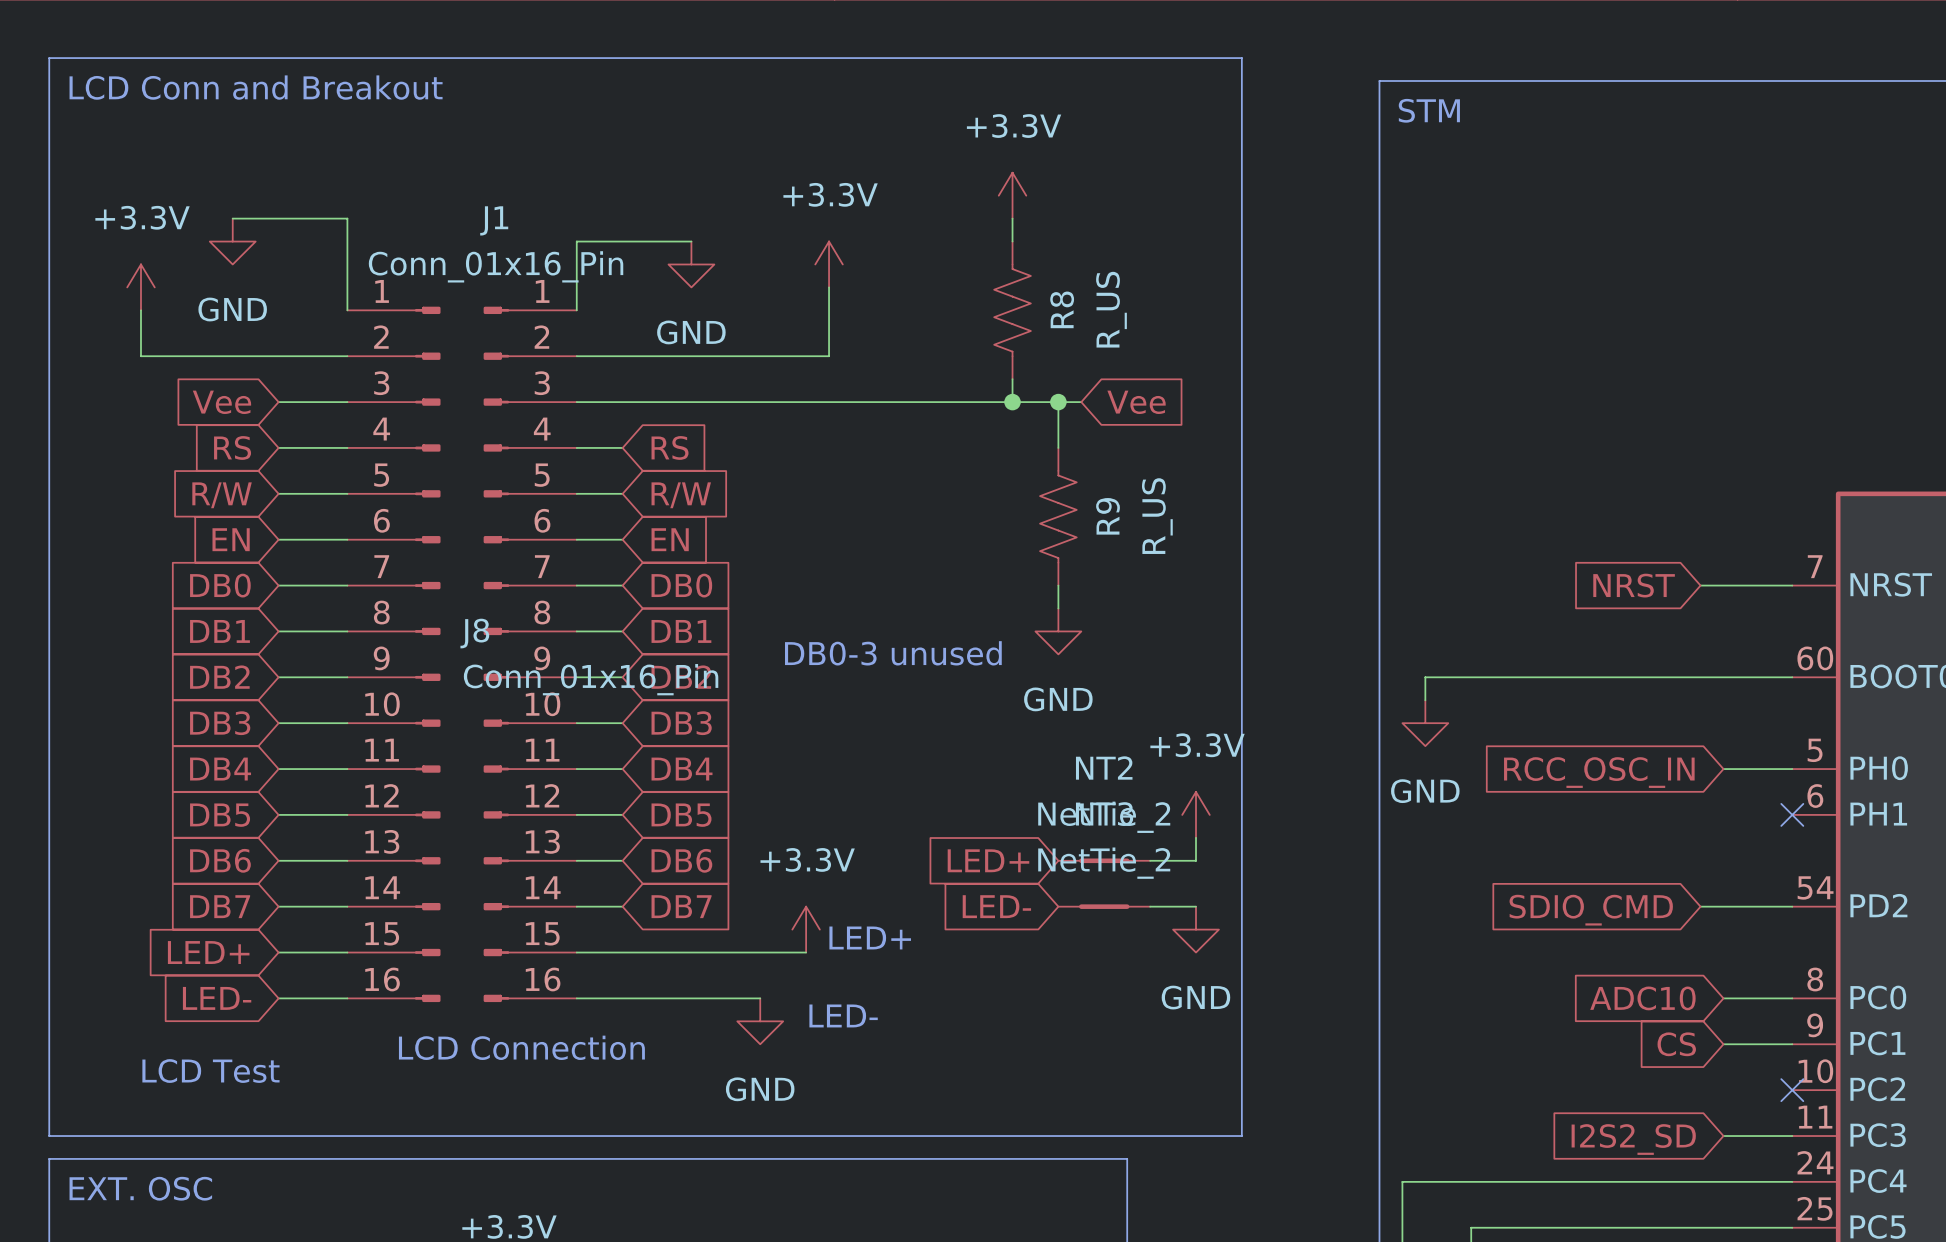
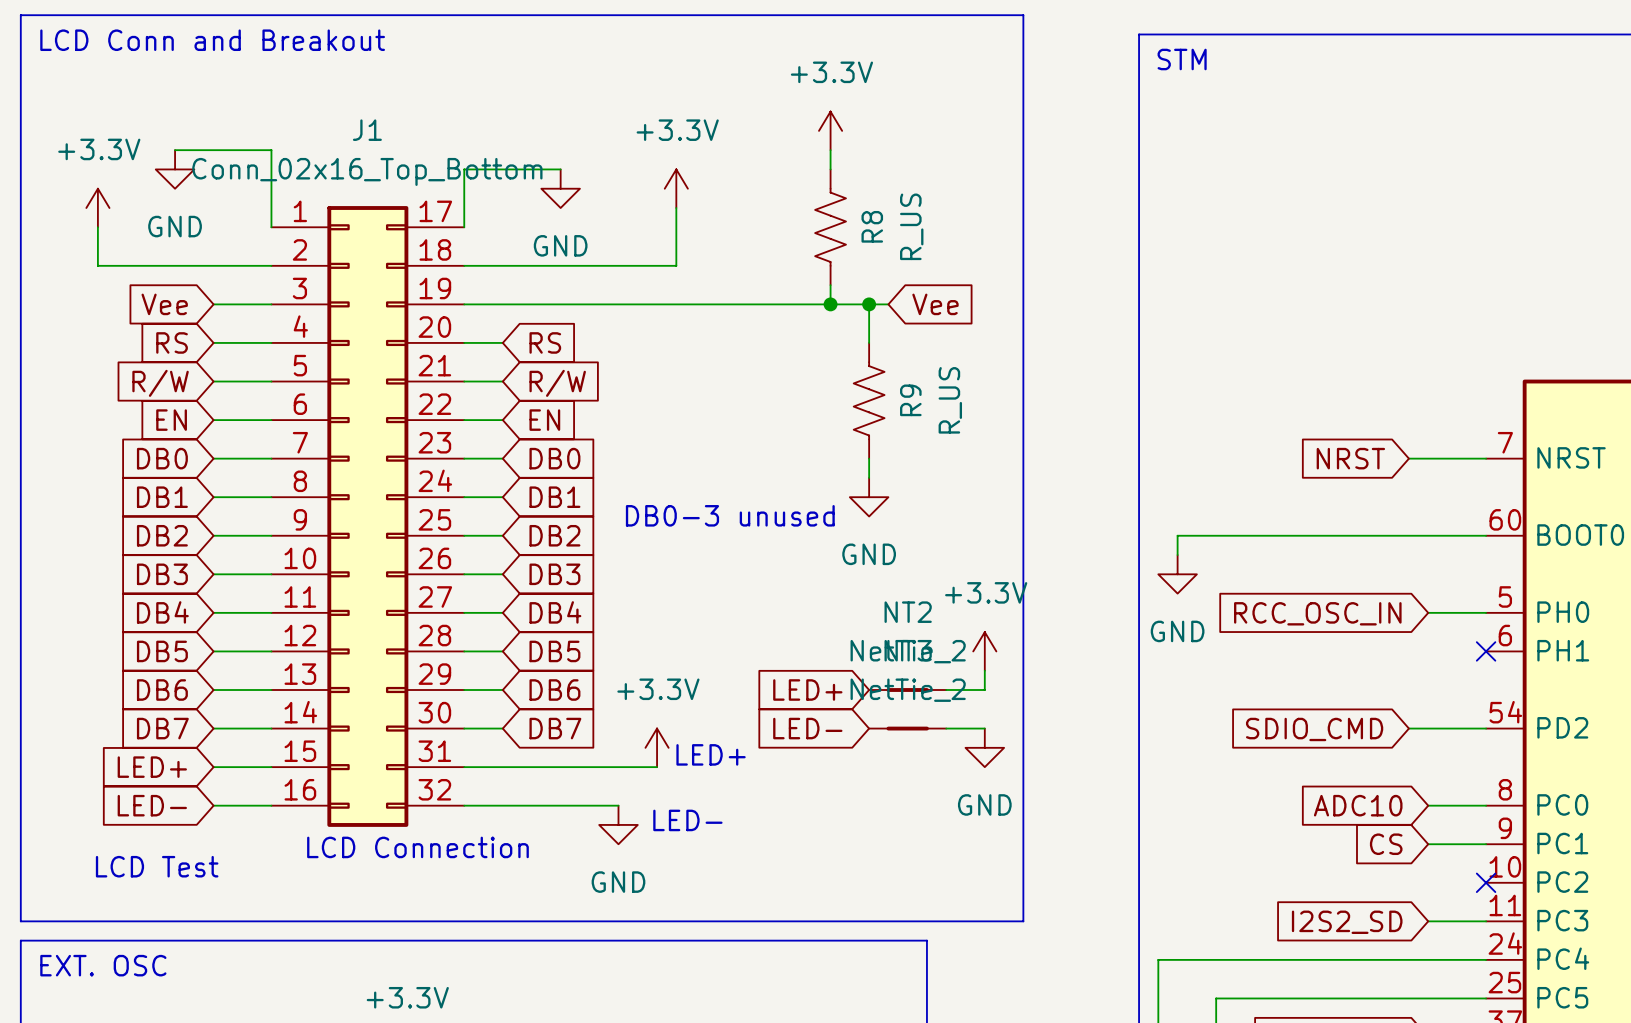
J1 name position: J1 (494, 220) -> J1 (367, 130)
J1 value: Conn_01x16_Pin (496, 266) -> Conn_02x16_Top_Bottom (367, 171)
J1 symbol: [483, 306, 577, 1003] -> [271, 206, 465, 827]
J8: Conn_01x16_Pin (393, 654) -> none

